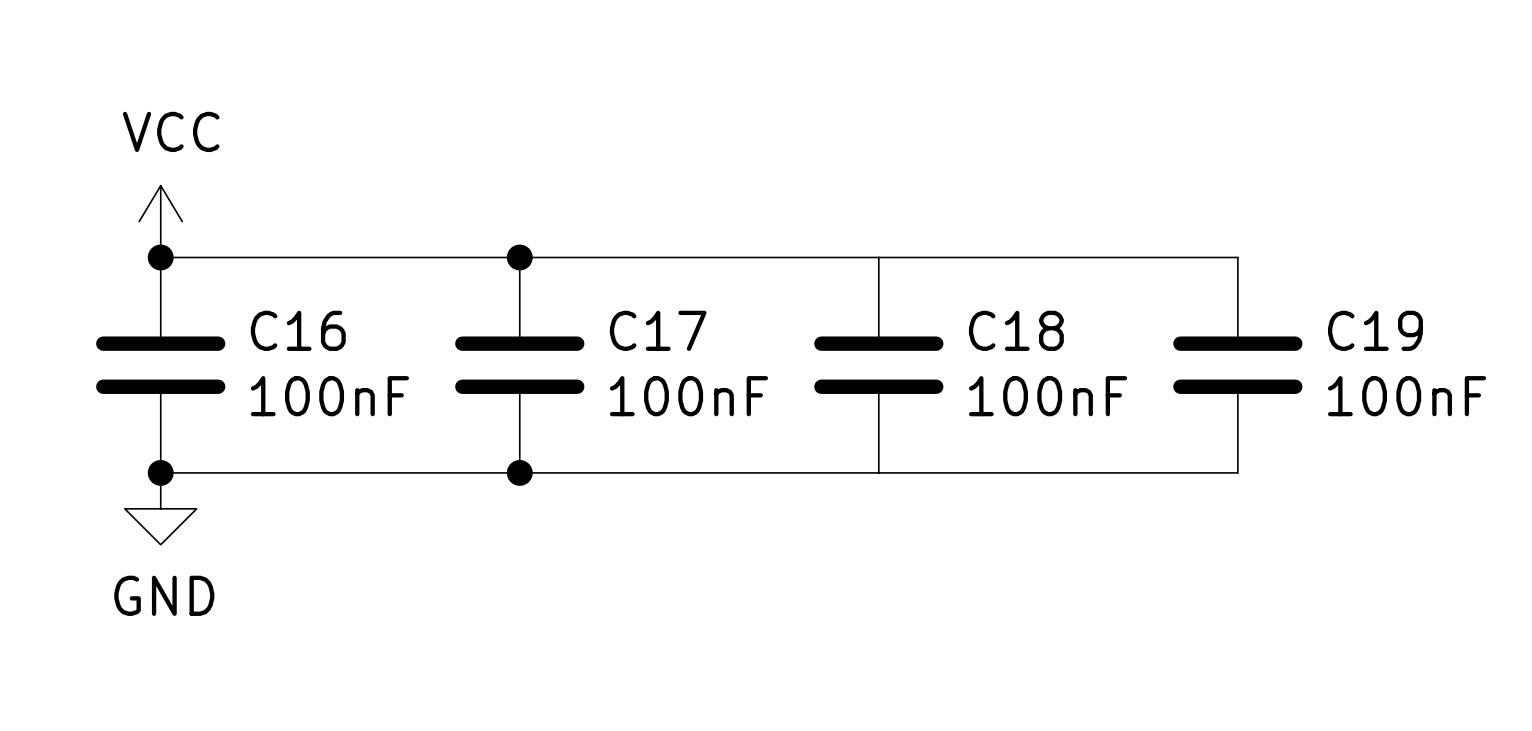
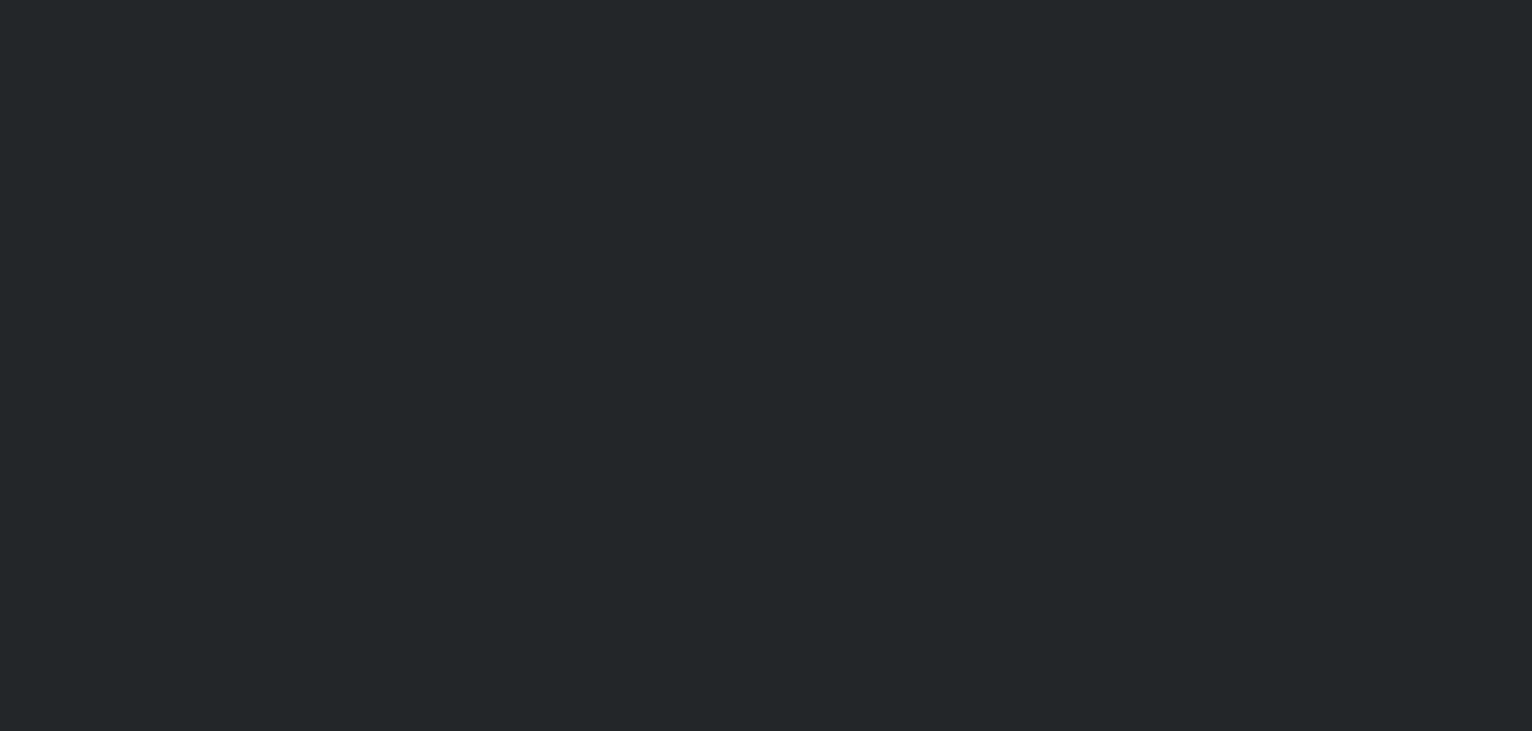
power symbol: VCC (160, 221) -> none
wire: (160, 257) (1237, 257) -> none
junction: (160, 257) -> none
junction: (519, 257) -> none
C16: 100nF (160, 365) -> none
C17: 100nF (519, 365) -> none
C18: 100nF (878, 365) -> none
C19: 100nF (1237, 365) -> none
wire: (160, 472) (1237, 472) -> none
junction: (160, 472) -> none
junction: (519, 472) -> none
power symbol: GND (160, 508) -> none

